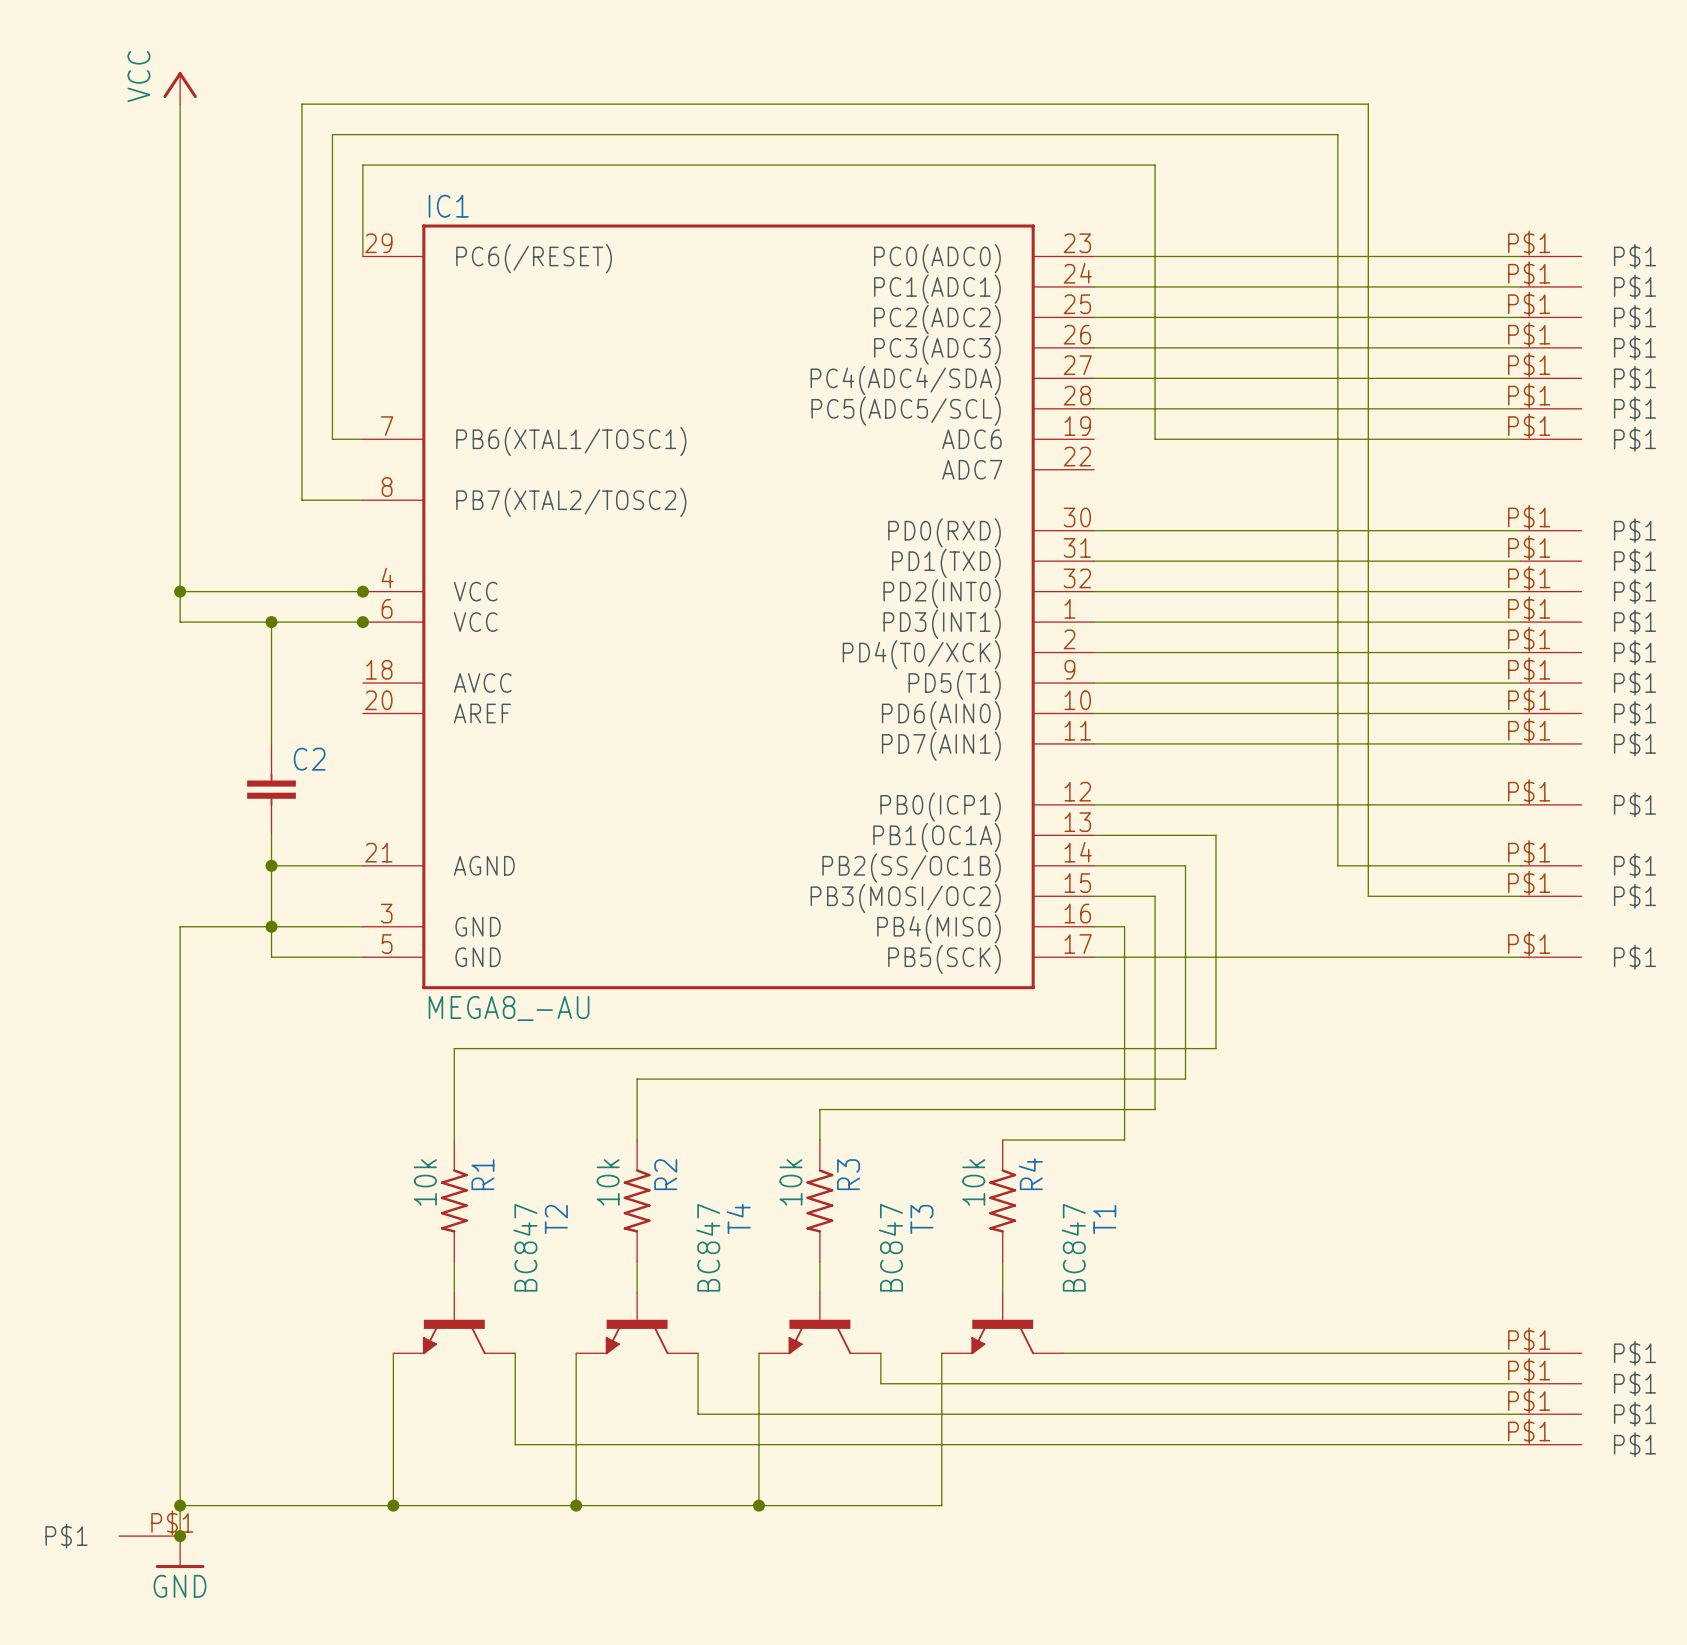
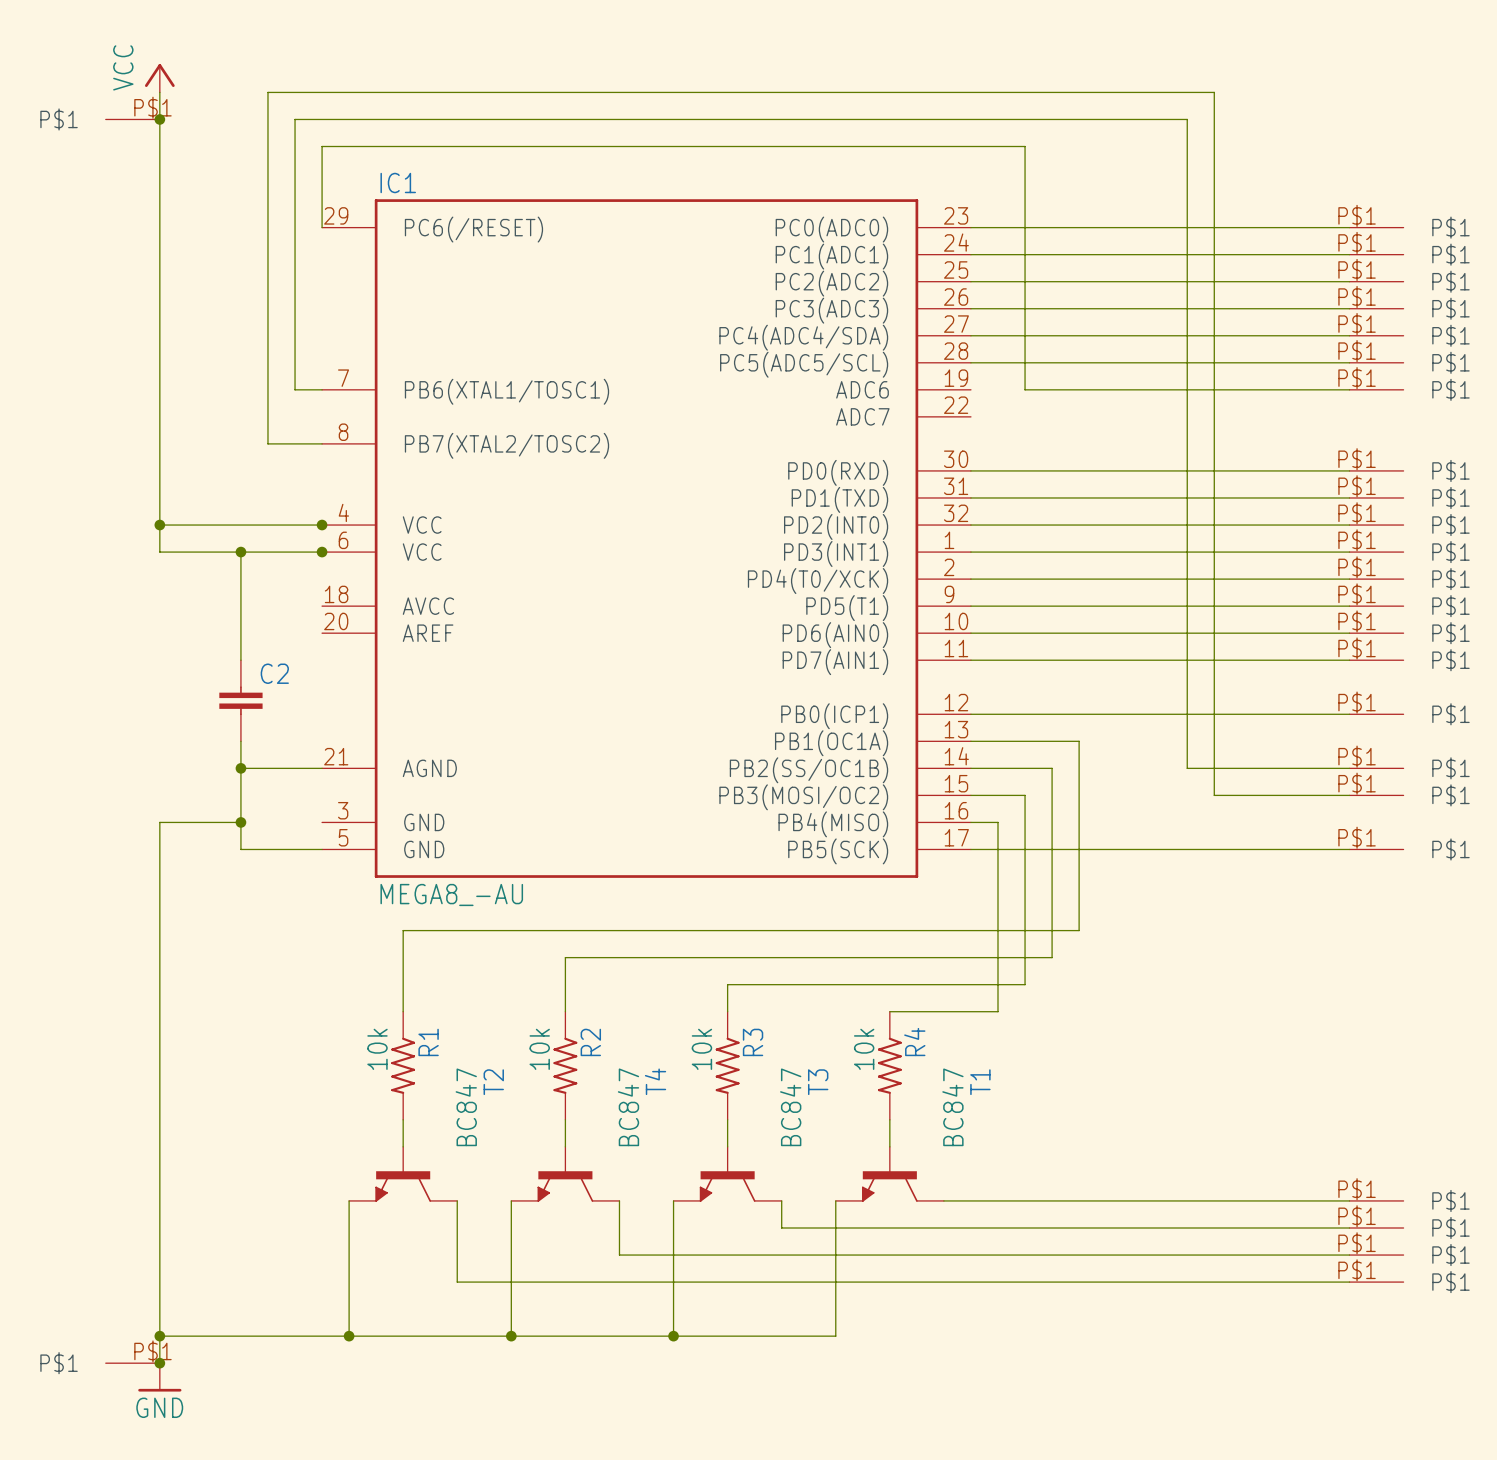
part: none -> (132, 119)
junction: none -> (159, 119)
wire: (271, 926) (362, 926) -> none

